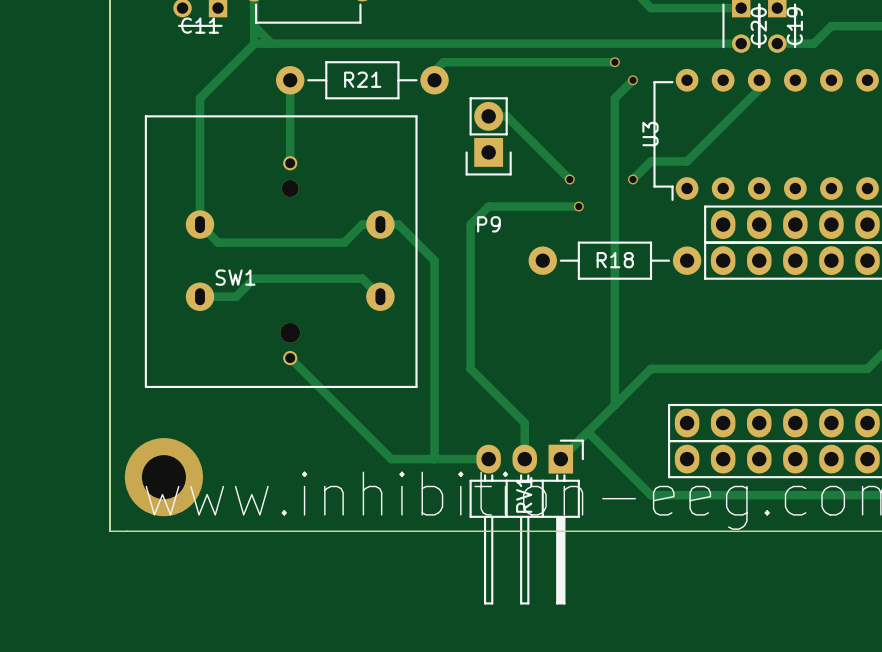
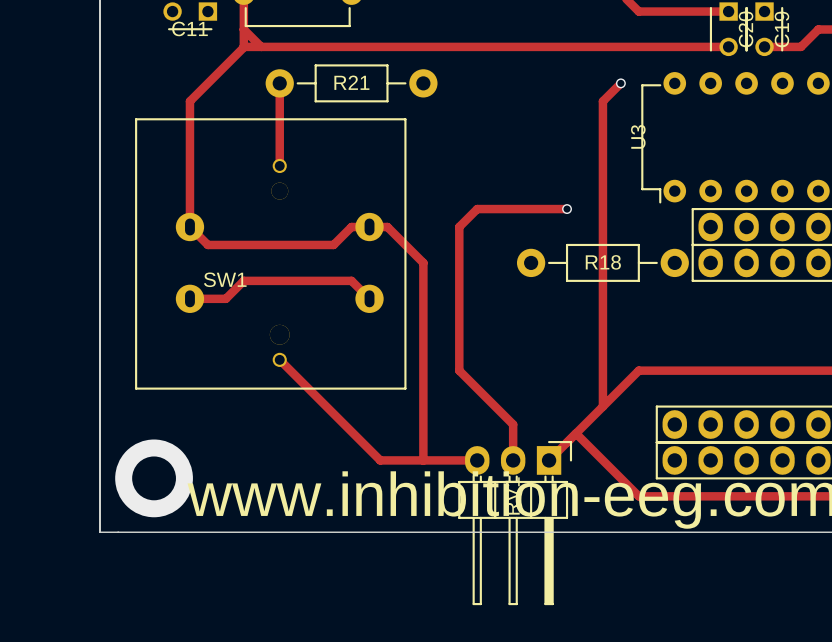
track: (614, 62) (443, 62) (434, 71) (434, 80) -> none
via: (614, 62) -> none
track: (759, 80) (759, 89) (687, 161) (651, 161) (632, 179) -> none
track: (488, 116) (506, 116) (569, 179) -> none
P9: (488, 136) -> none
via: (569, 179) -> none
via: (632, 179) -> none

